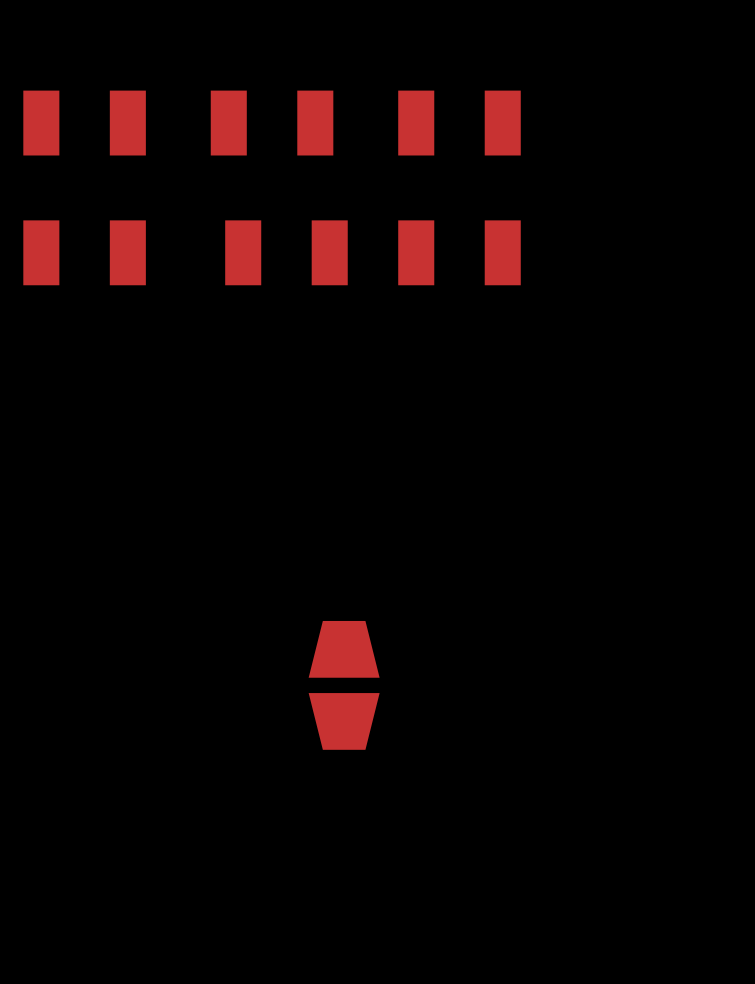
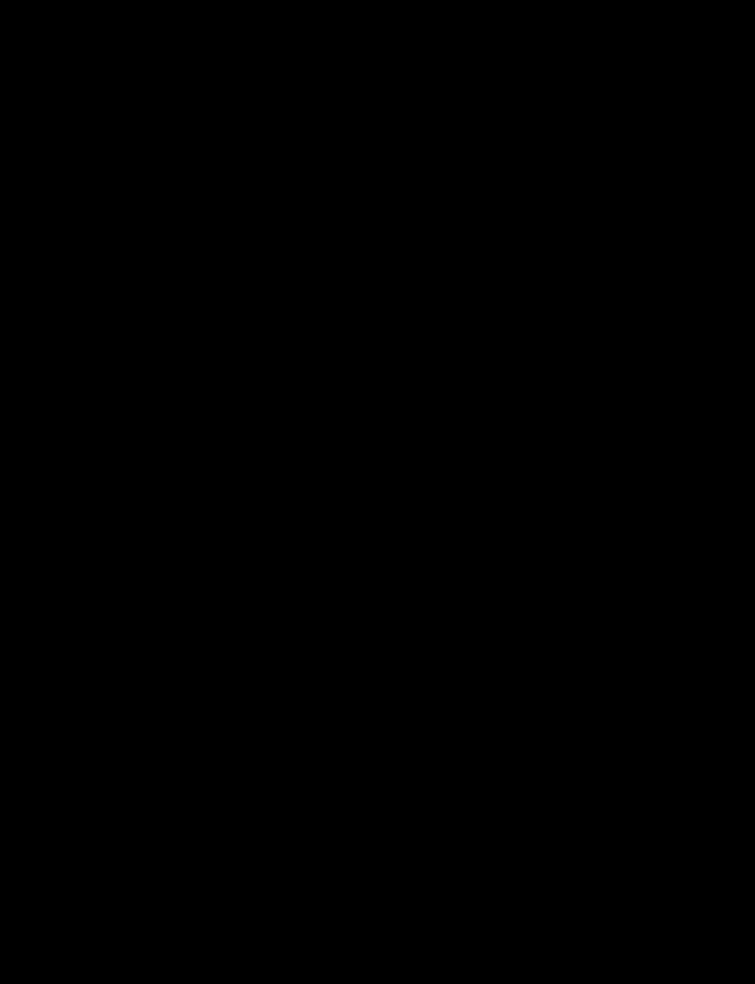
part: (84, 123) -> none
part: (272, 123) -> none
part: (459, 123) -> none
part: (84, 252) -> none
part: (286, 252) -> none
part: (459, 252) -> none
part: (344, 685) -> none

